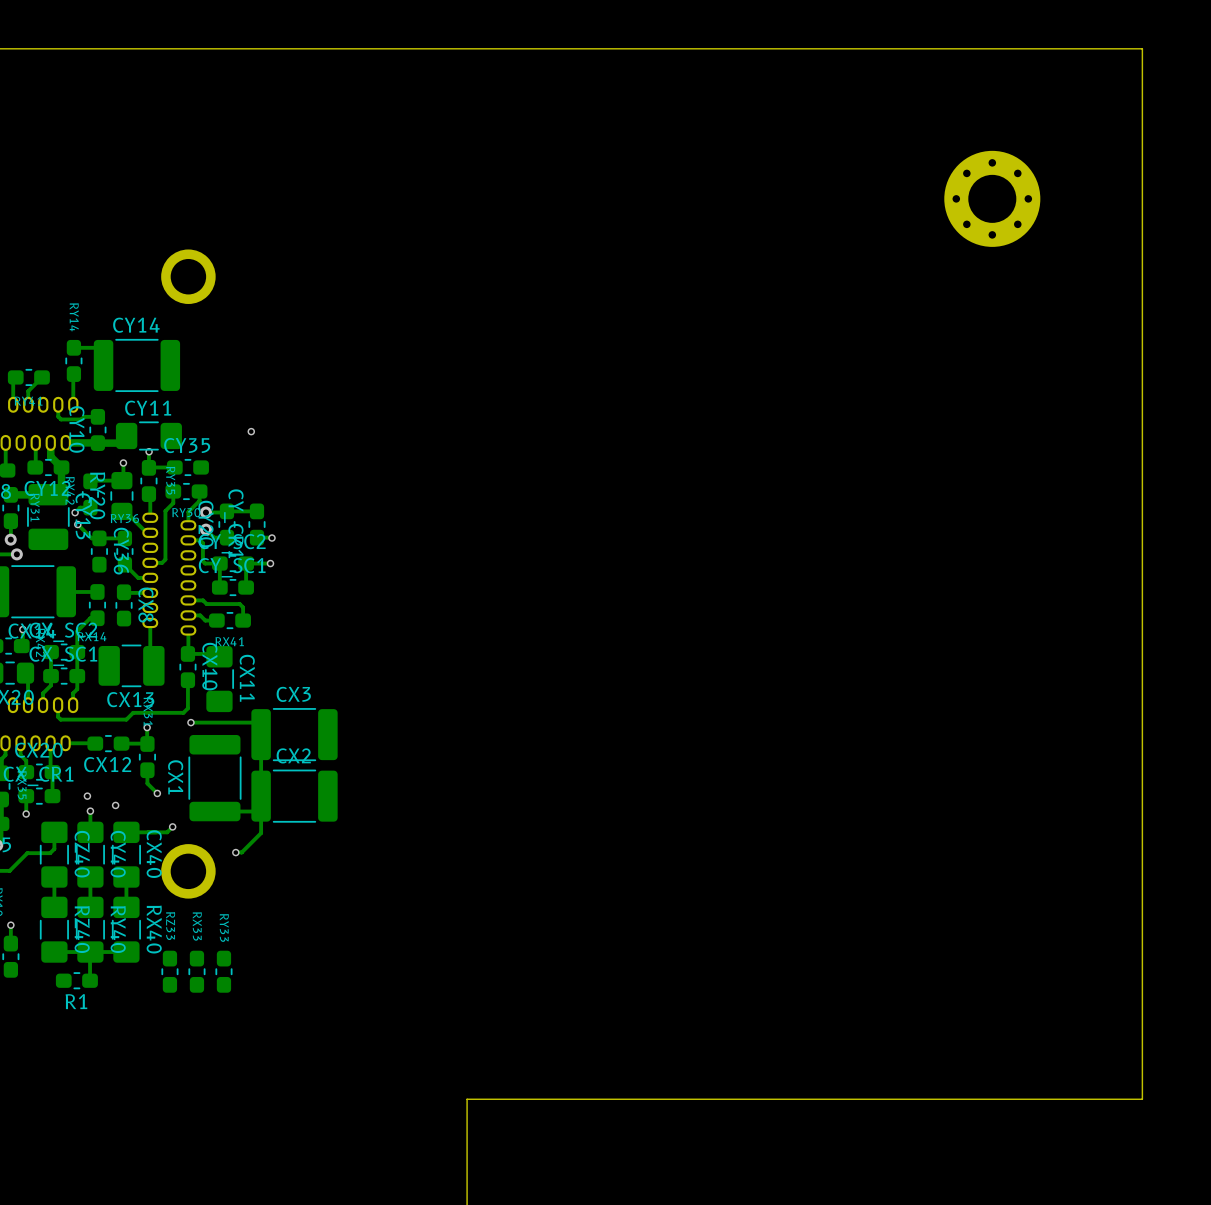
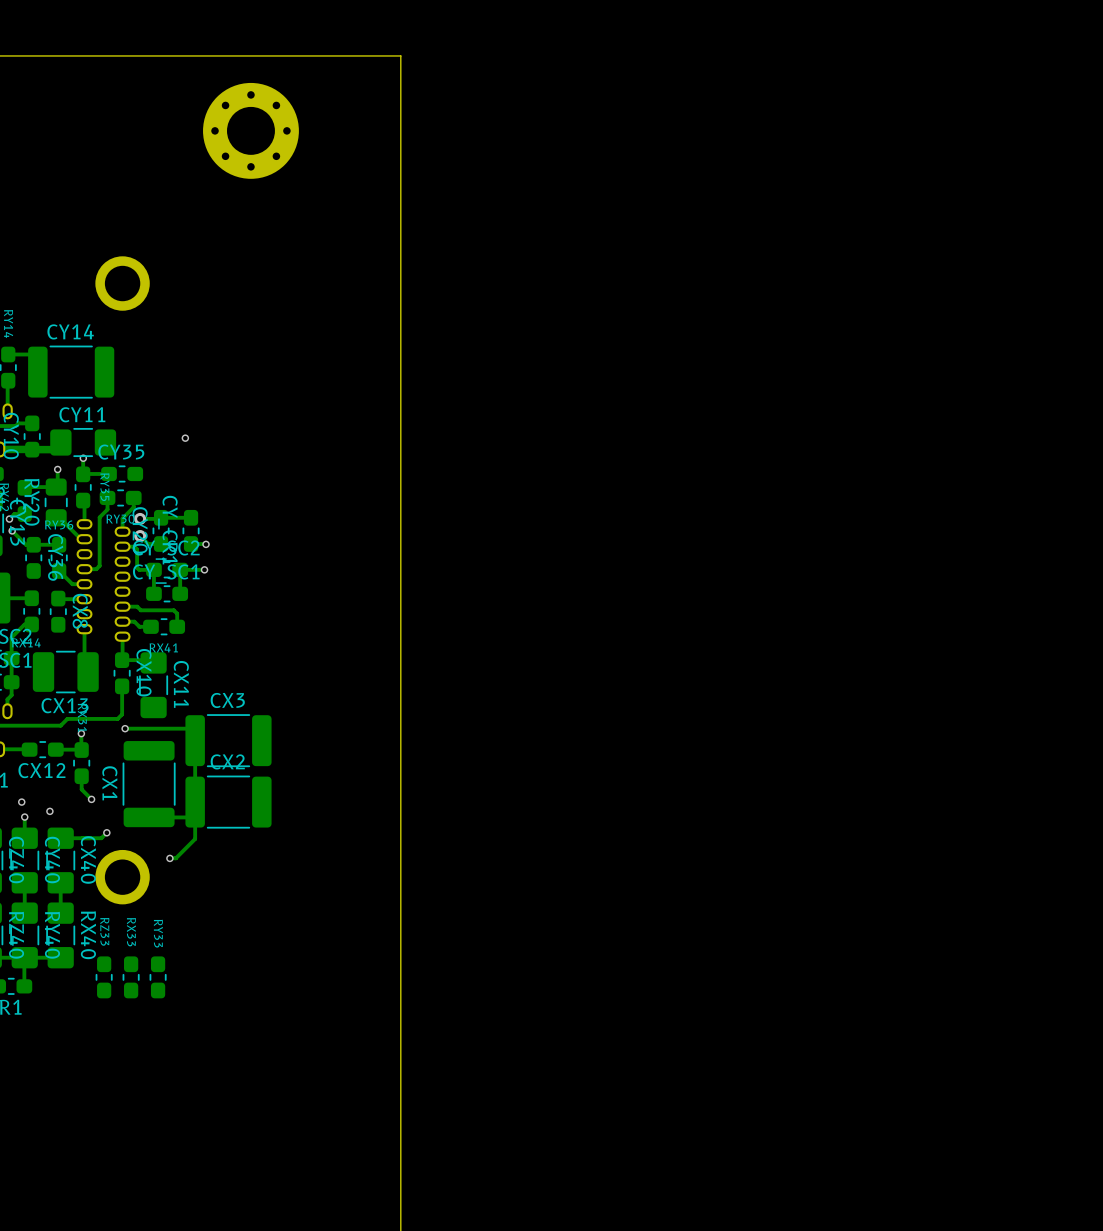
board edge: (467, 48) (1142, 48) (1142, 1099) (467, 1099) -> (400, 55) (400, 1104)
part: none -> (250, 130)
part: (992, 198) -> none

